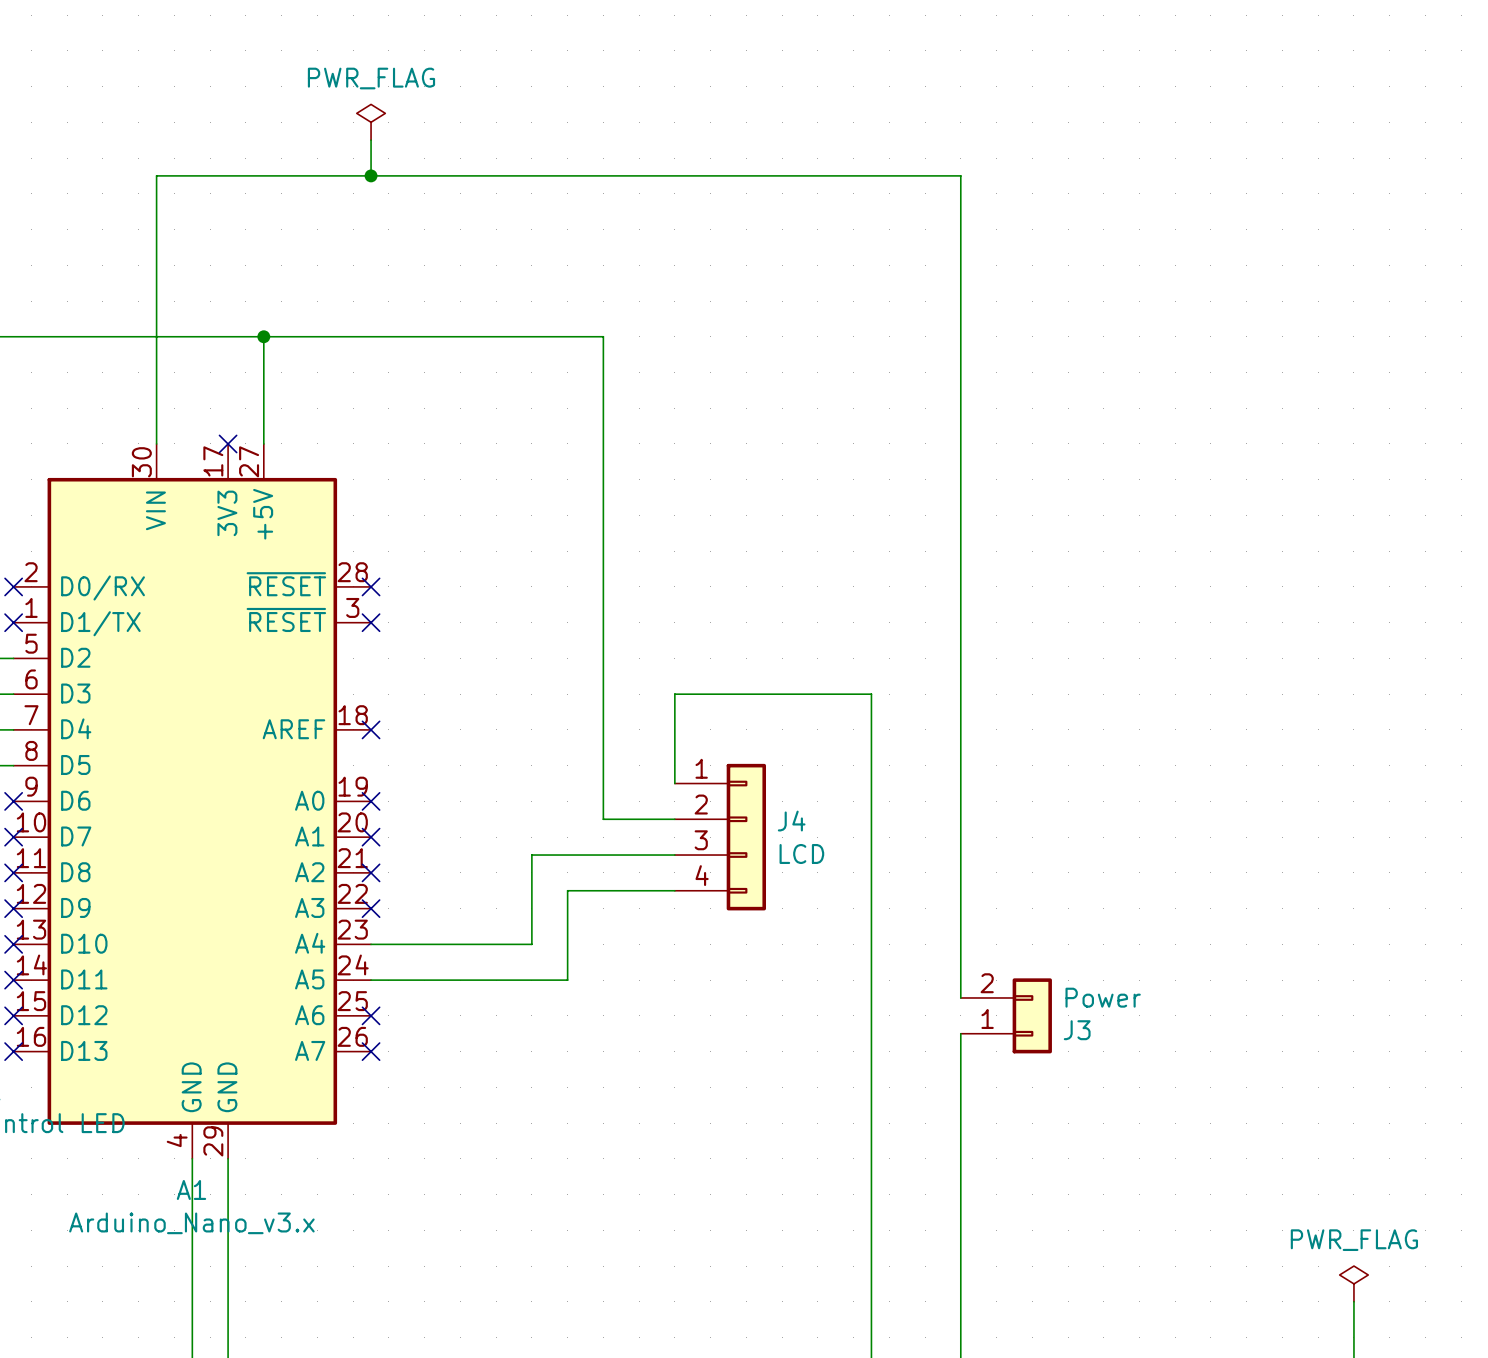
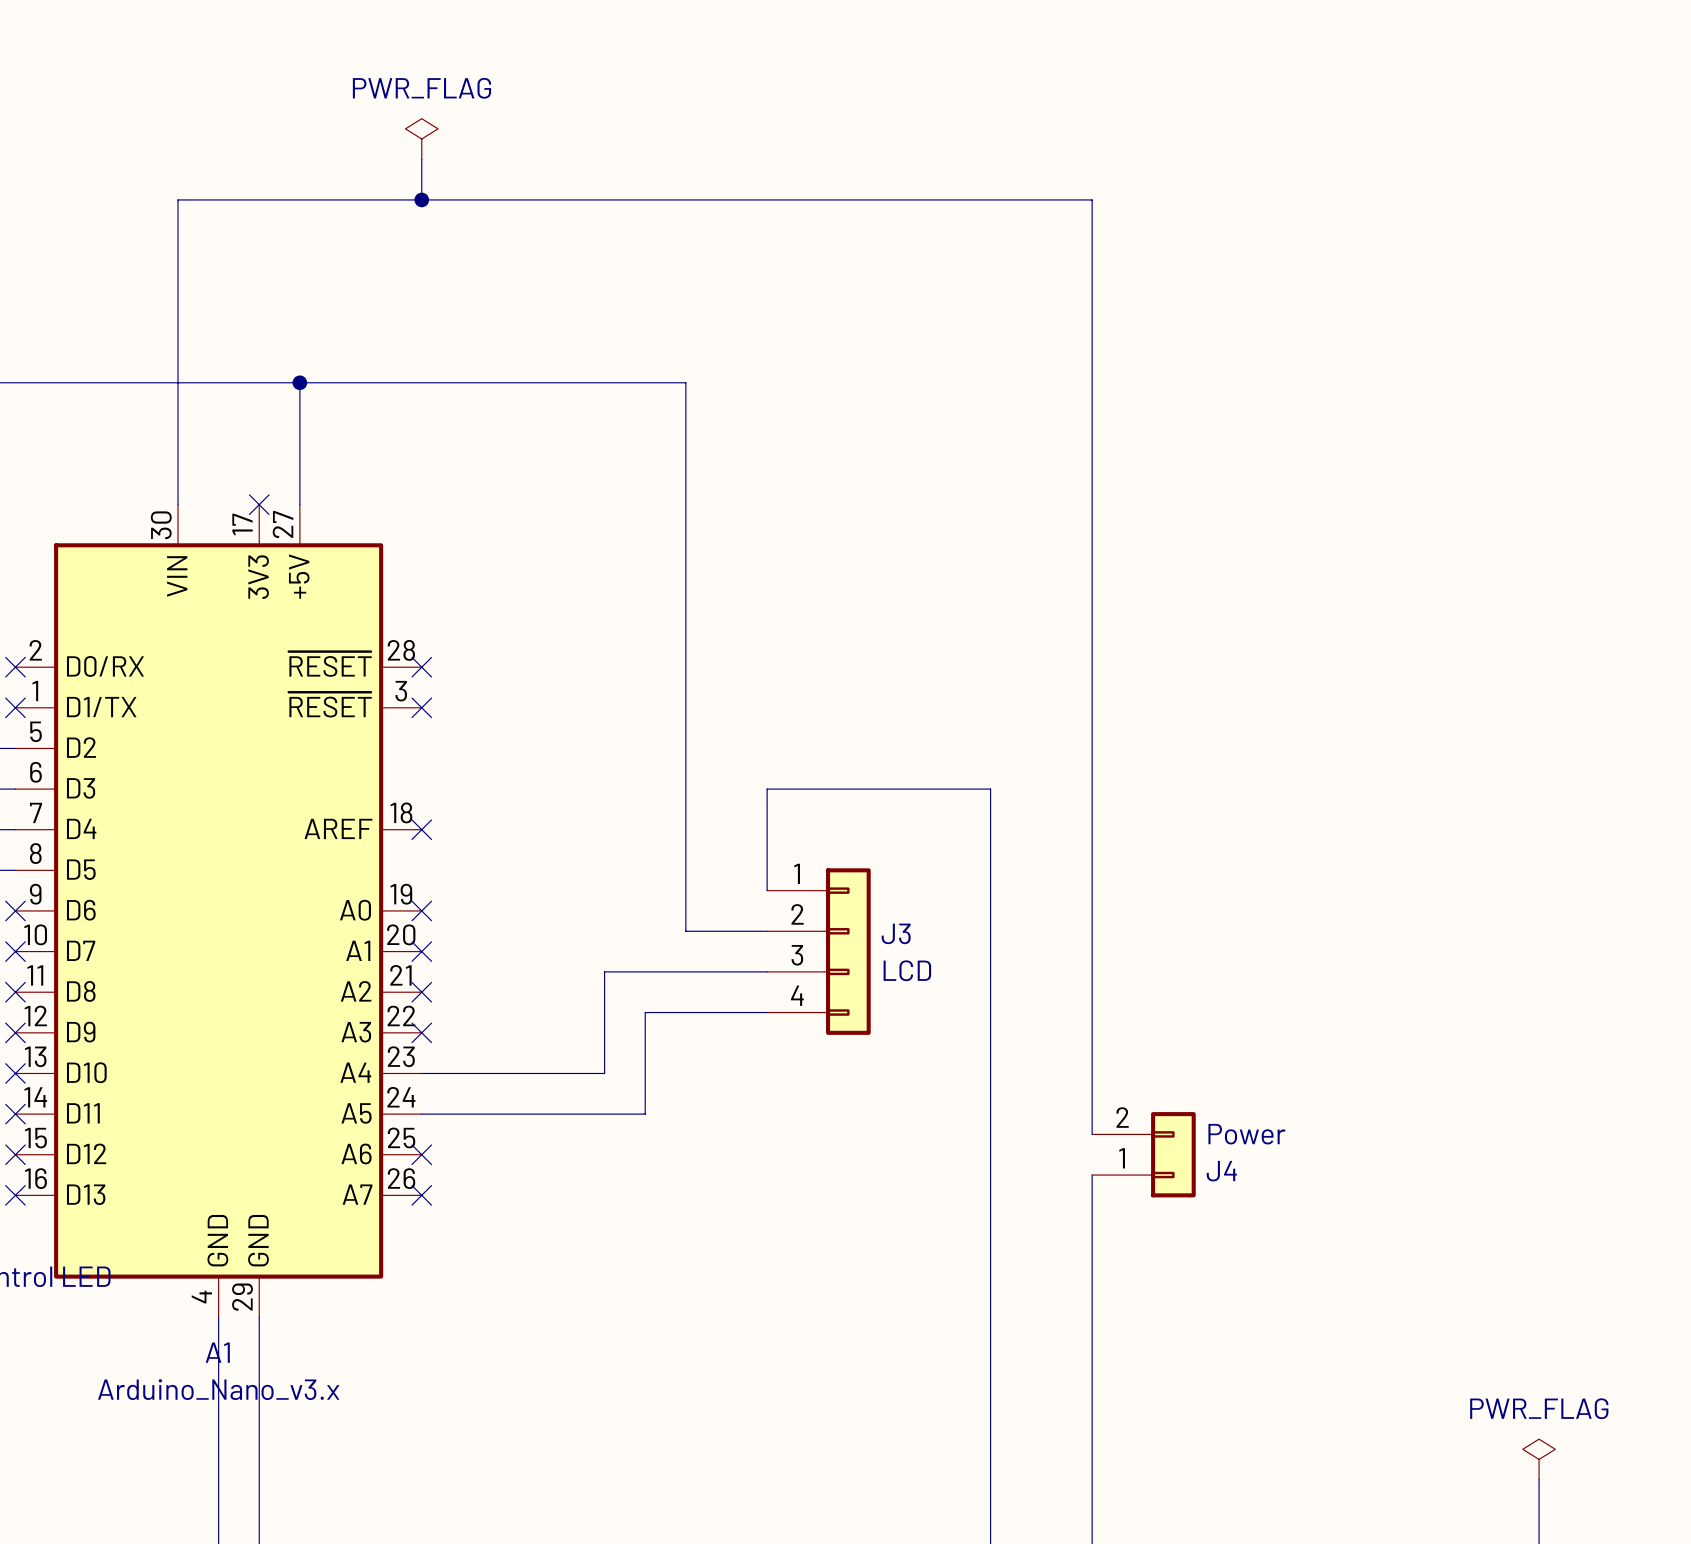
J4 name: J4 (791, 821) -> J3 (896, 933)
J3 name: J3 (1077, 1030) -> J4 (1221, 1171)

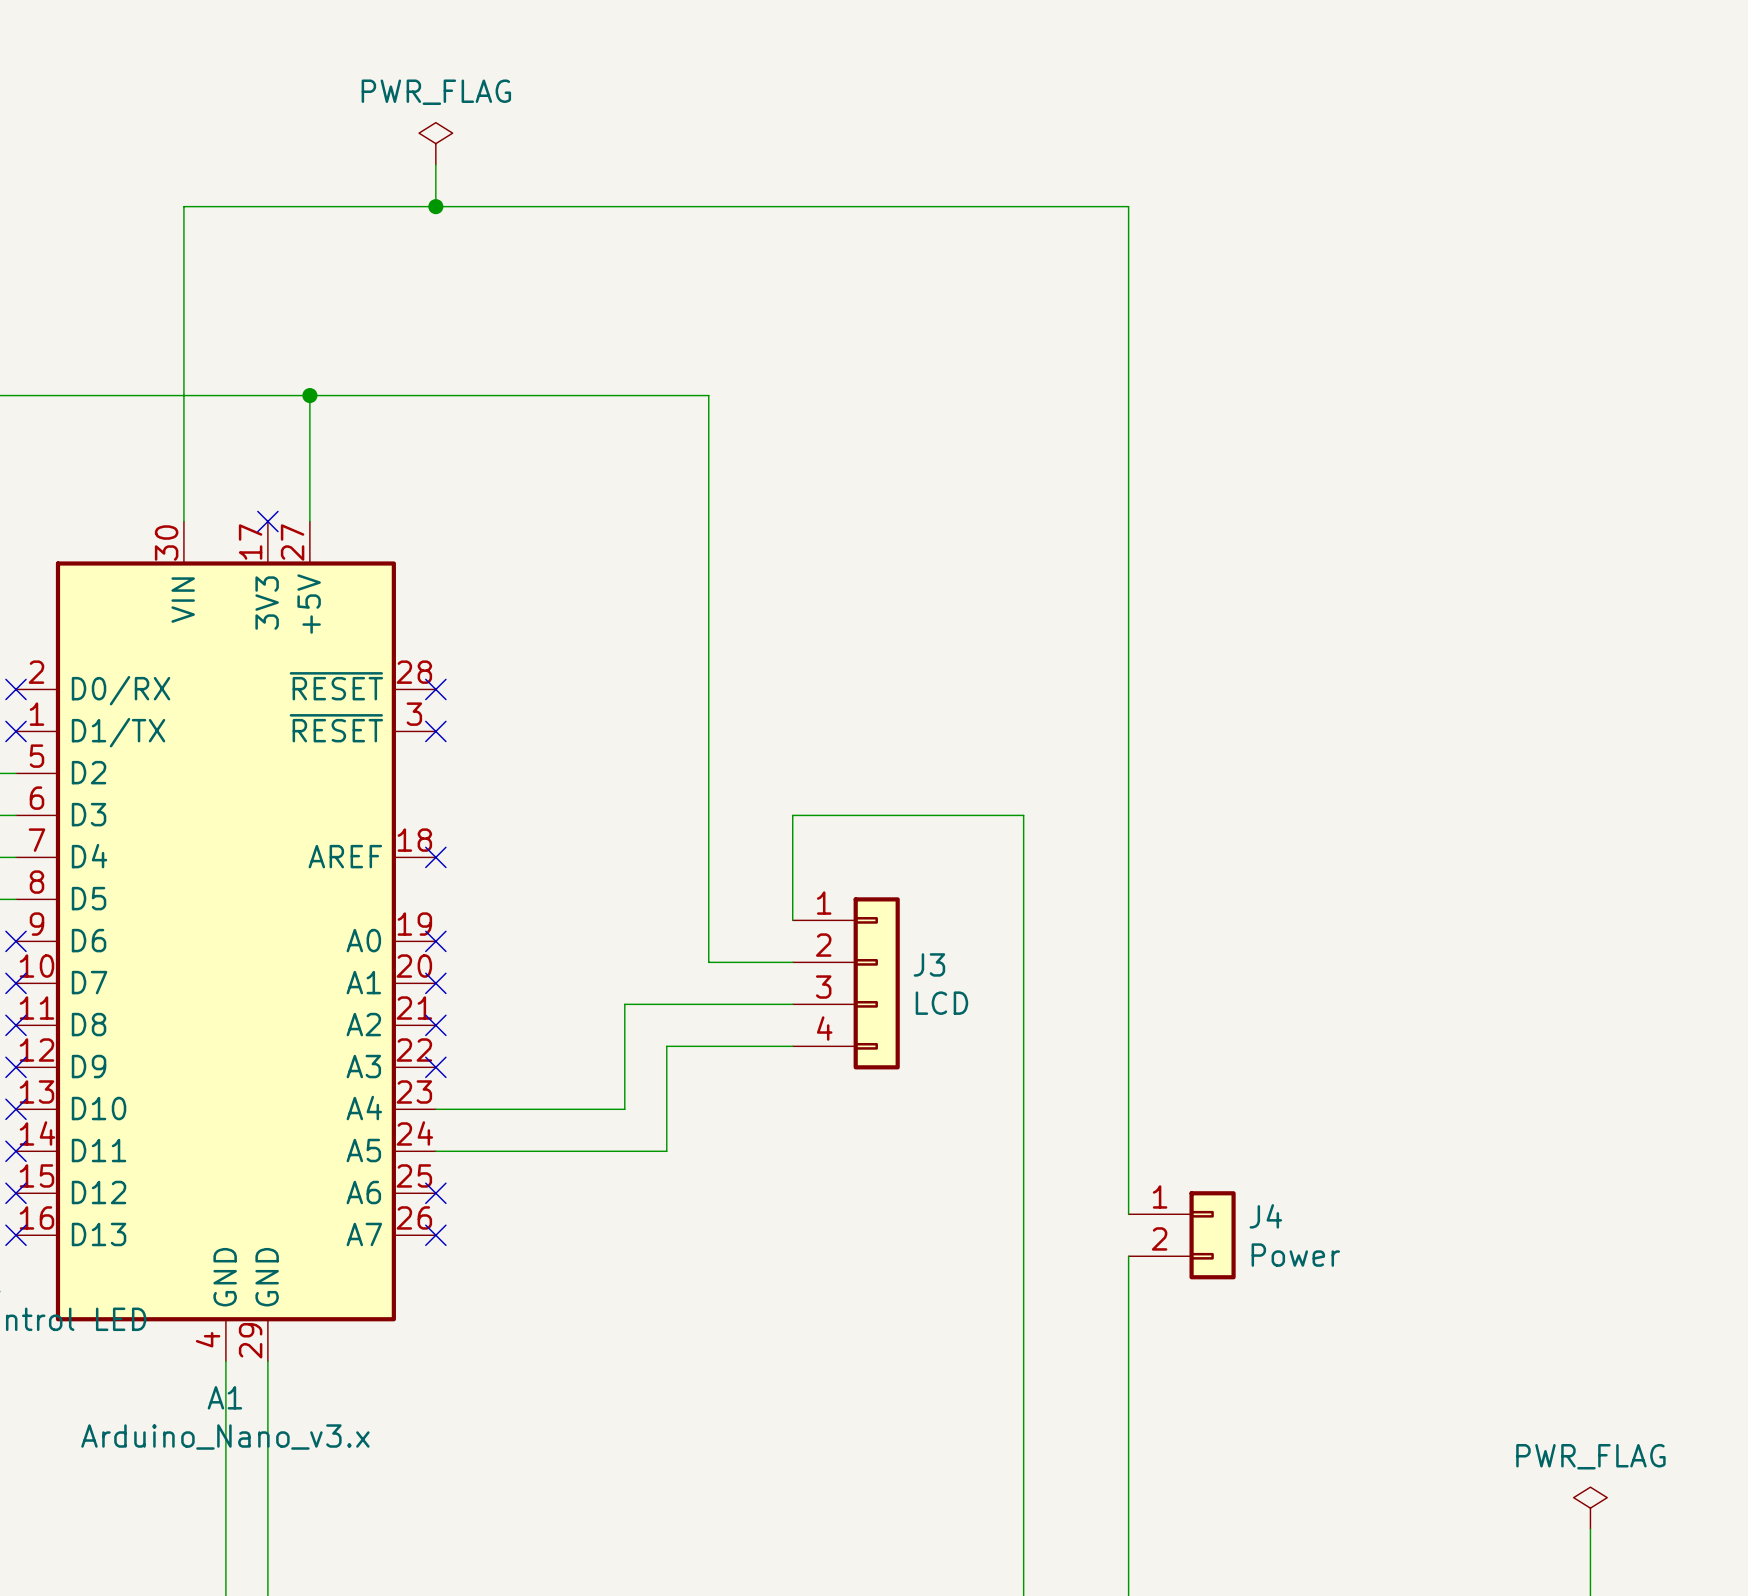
J4 flip: as is (1173, 1154) -> up-down (1212, 1235)
wire: (1092, 1175) (1092, 1215) -> (1128, 1214) (1128, 1172)

